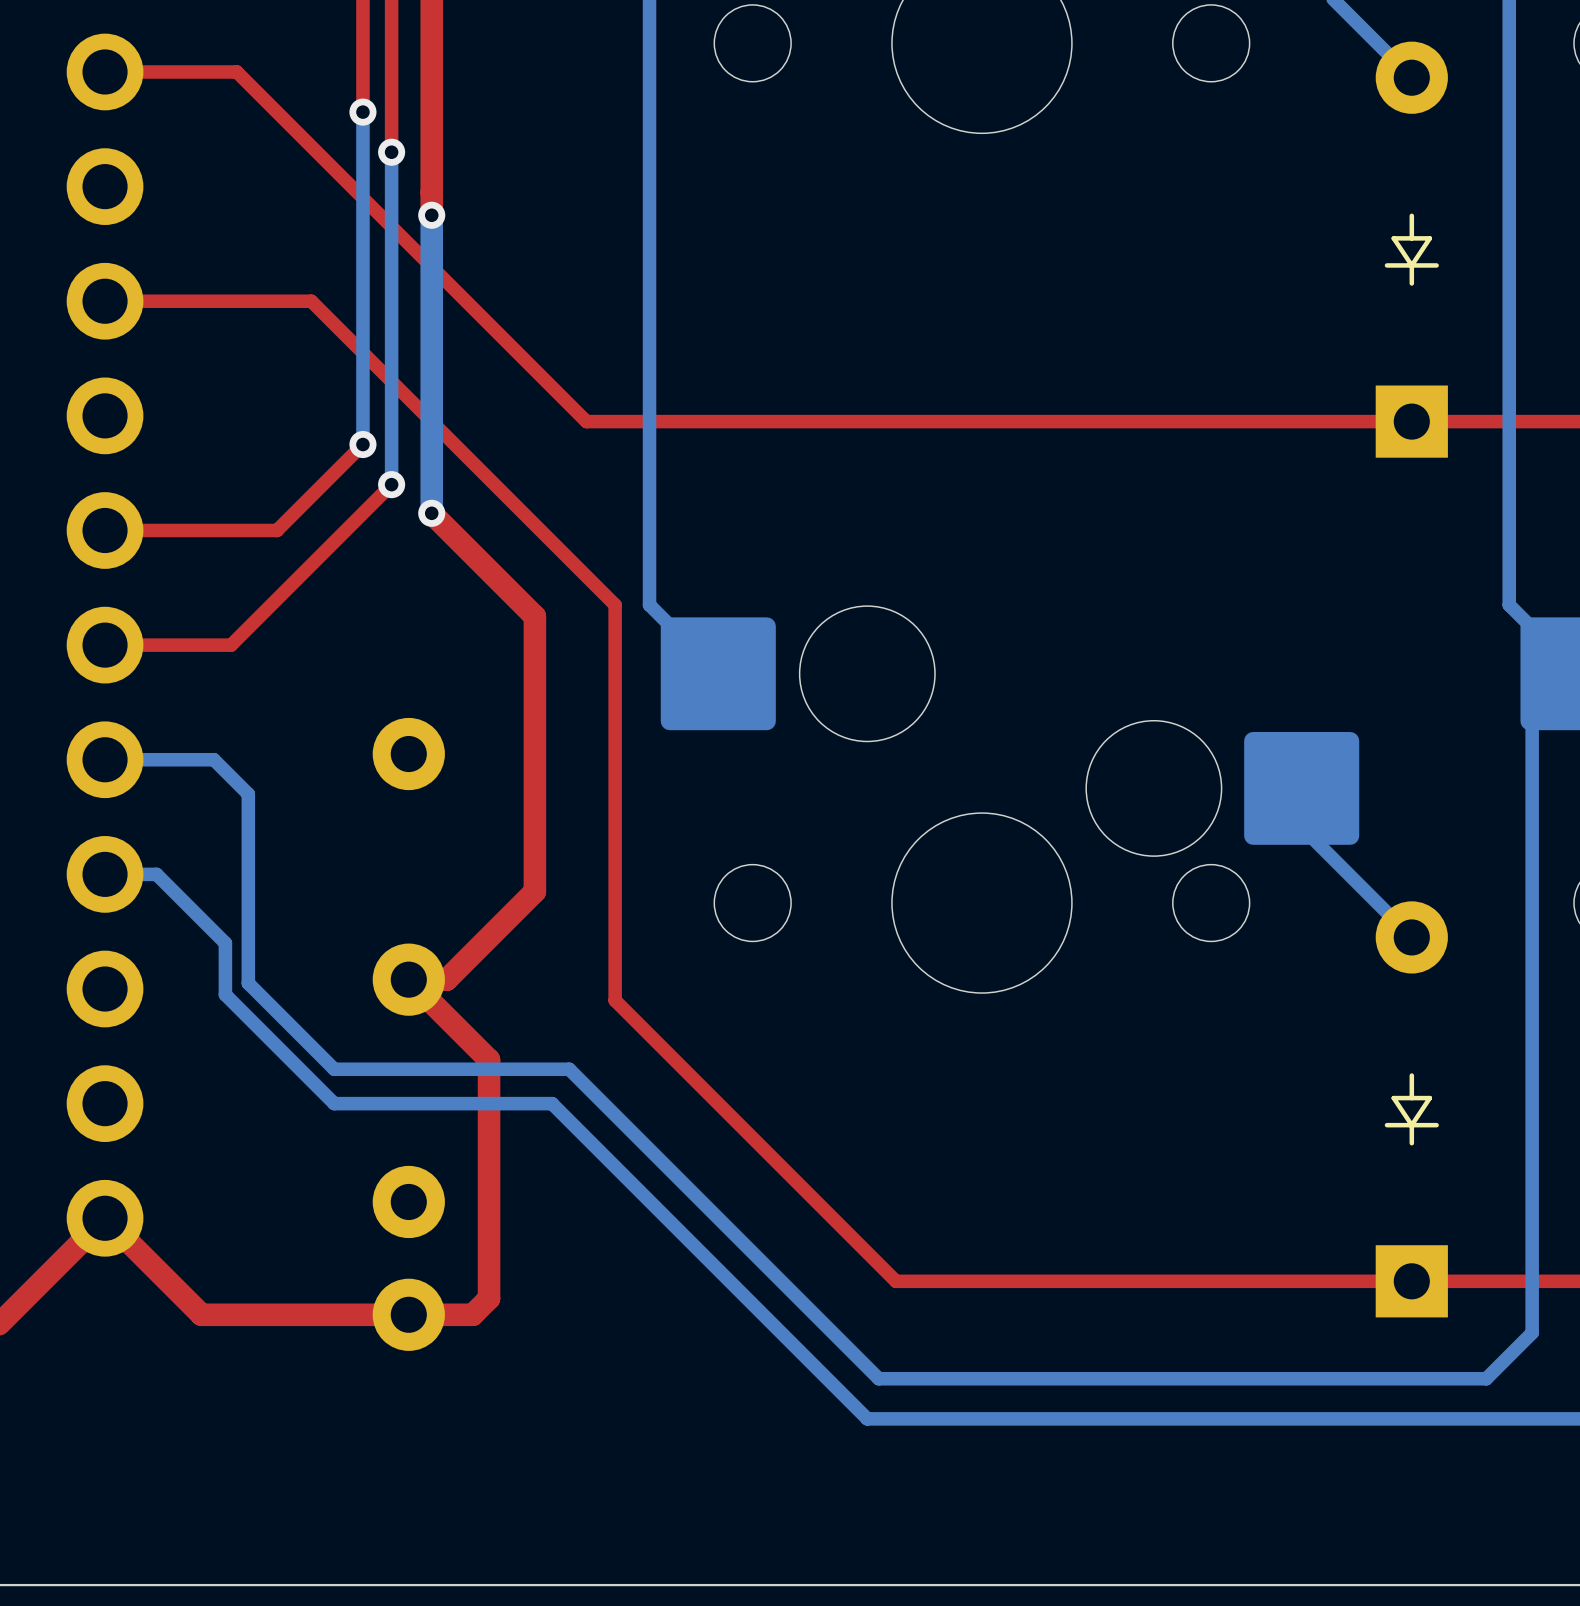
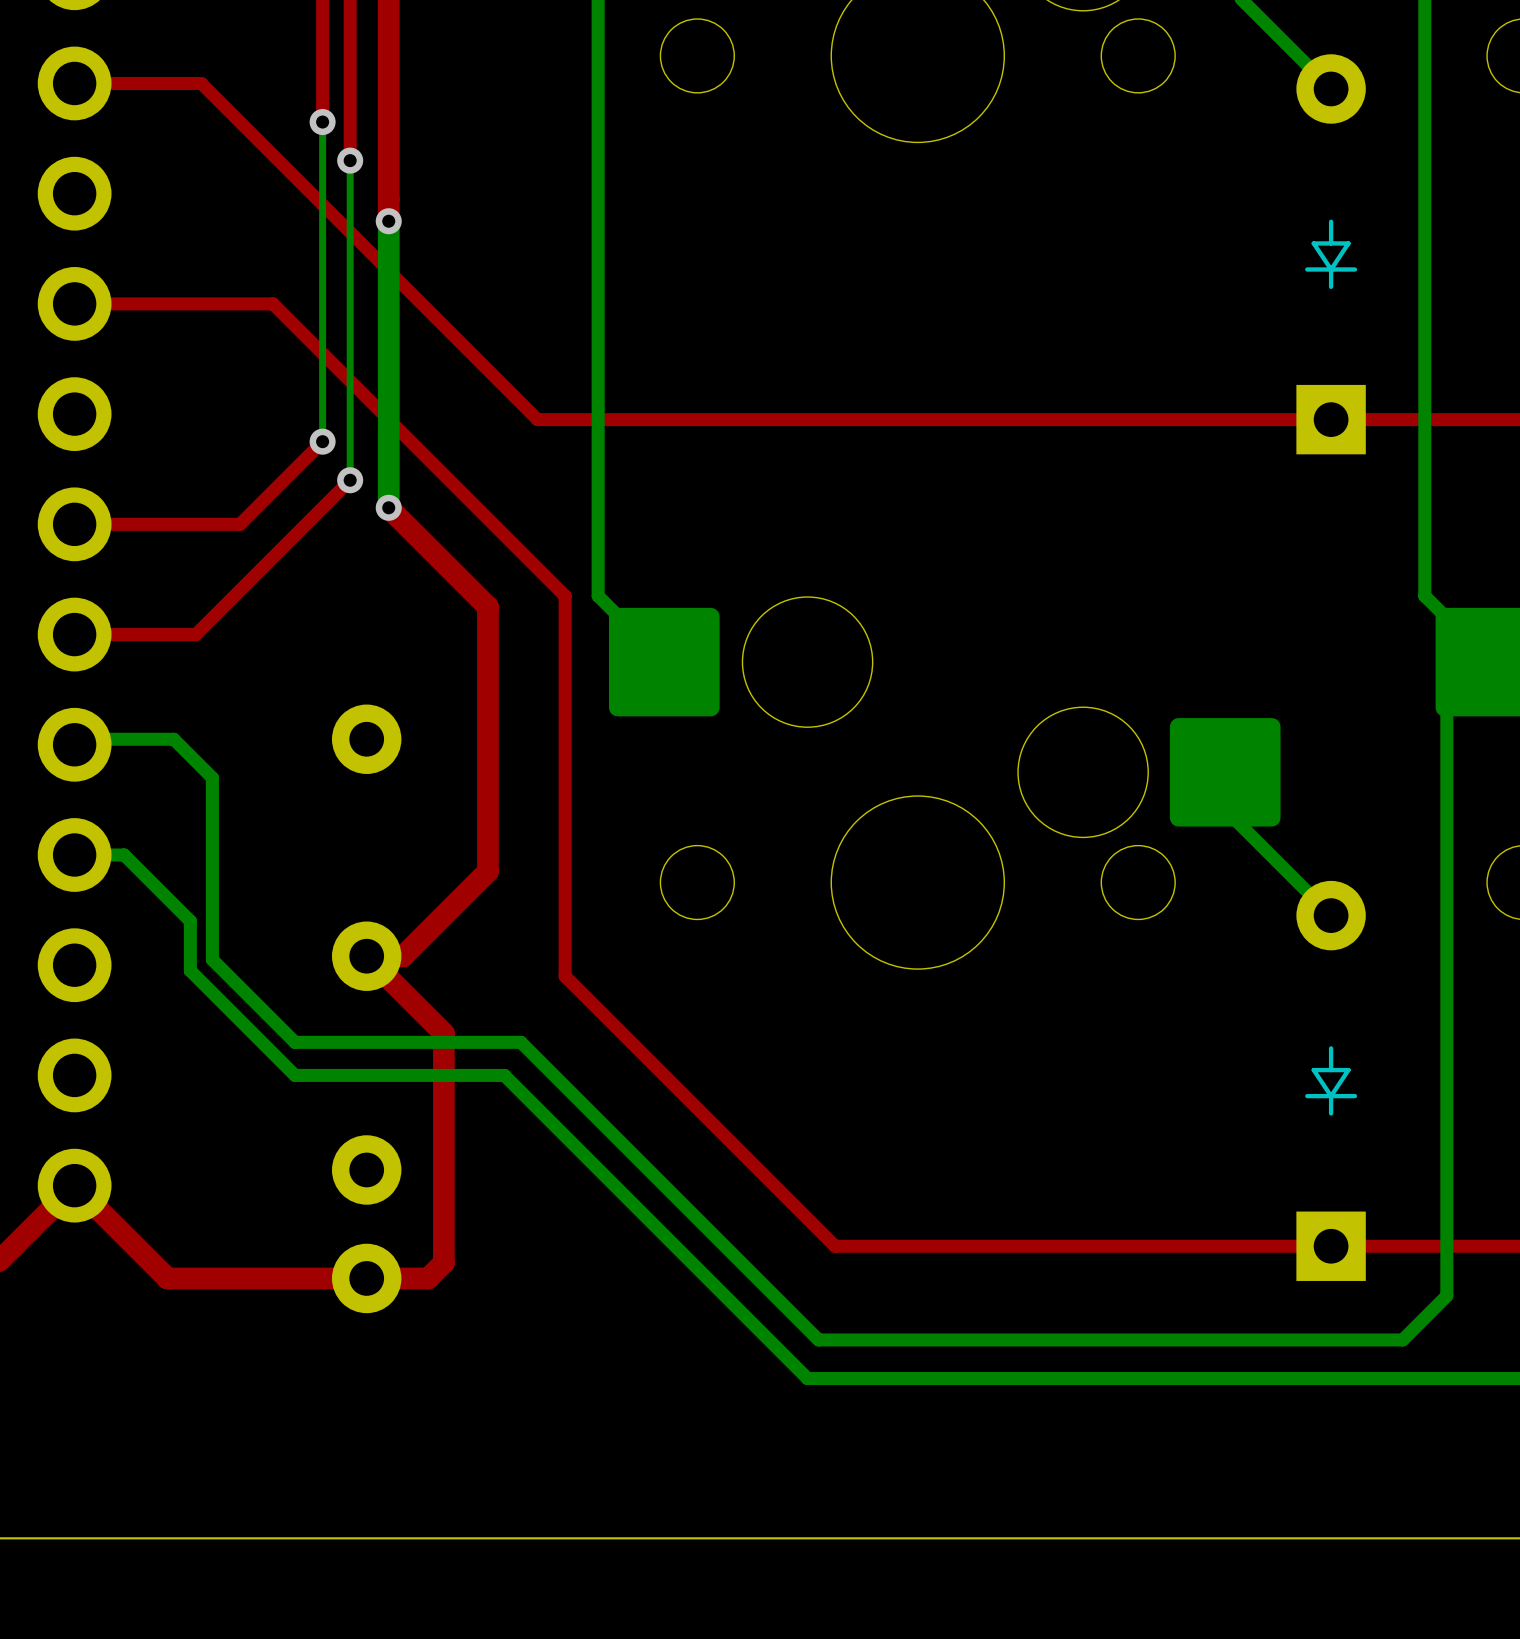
bottom track width: thick (362, 112) (362, 444) -> thin (322, 122) (322, 441)
bottom track width: thick (391, 152) (391, 484) -> thin (350, 160) (350, 480)
bottom track: (213, 759) (105, 759) -> (179, 744) (173, 739) (107, 739)

